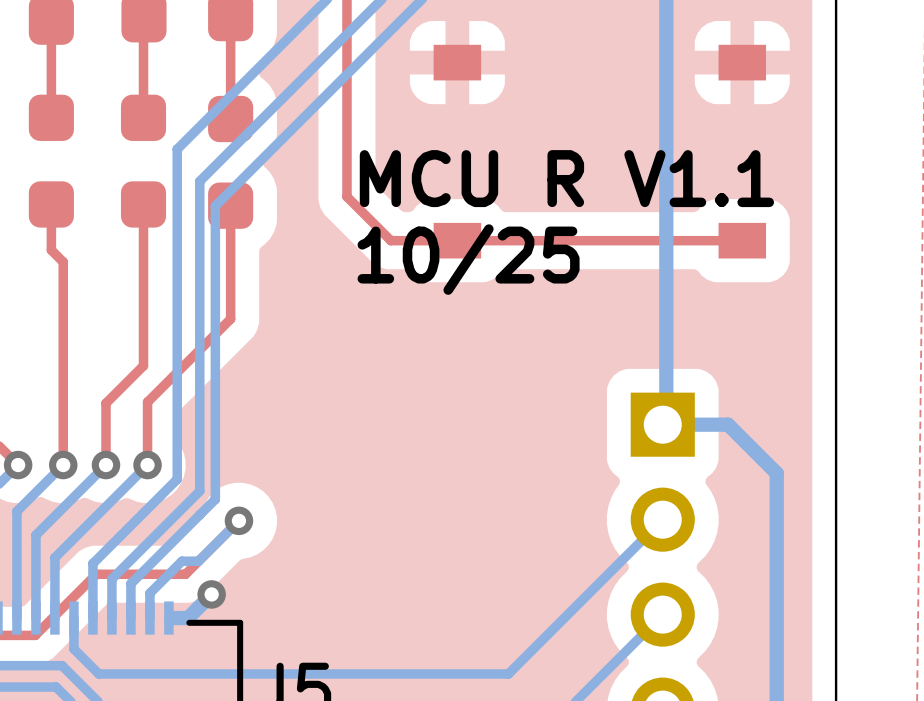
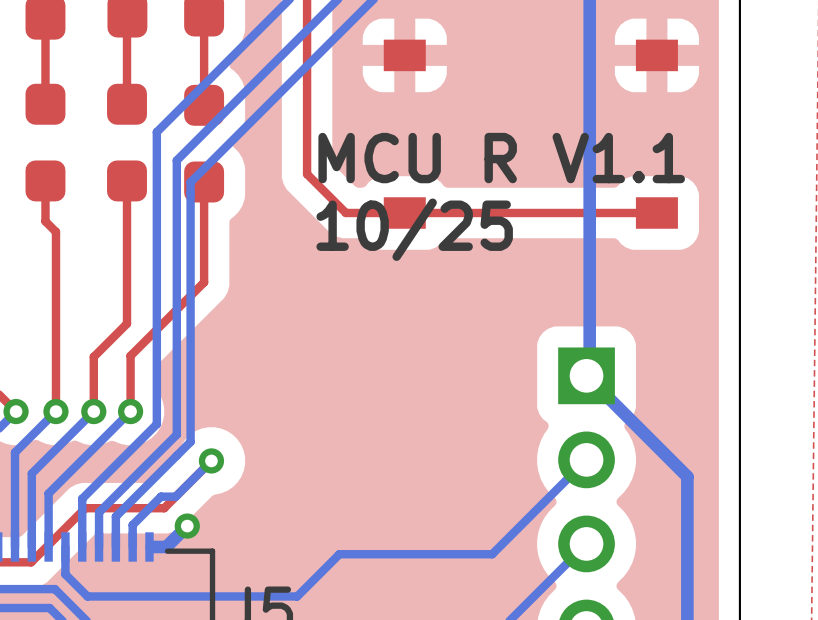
bottom track: (662, 424) (728, 424) (776, 473) (776, 538) -> (586, 375) (687, 476)
bottom track: (556, 626) (508, 673) (335, 673) -> (492, 554) (339, 554) (297, 596)

